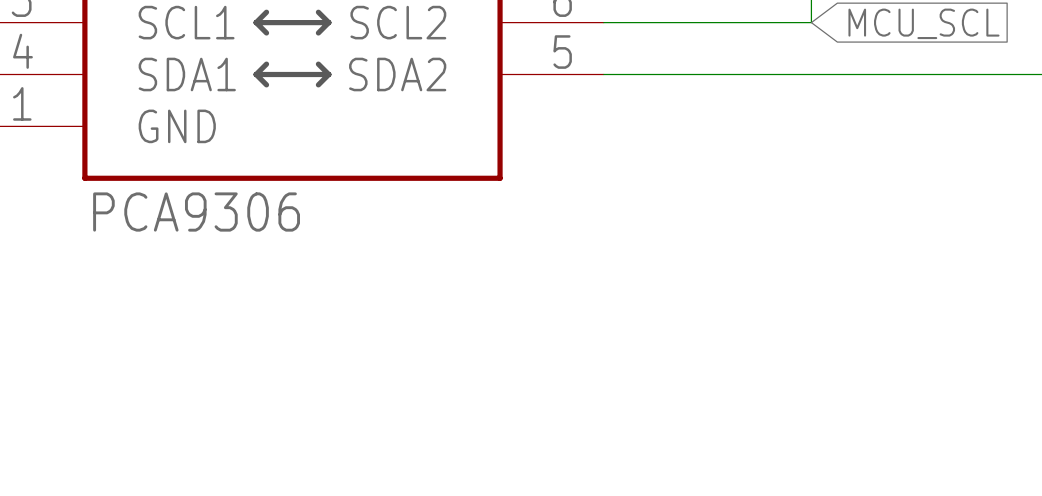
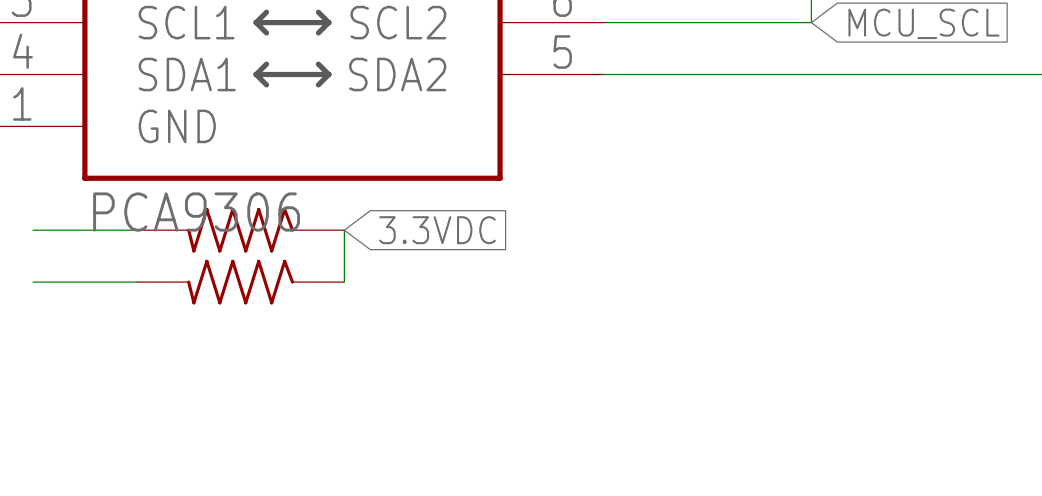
wire: none -> (33, 230) (136, 230)
part: none -> (240, 230)
wire: none -> (344, 230) (344, 282)
global label: none -> 3.3VDC (437, 230)
wire: none -> (33, 282) (136, 282)
part: none -> (240, 282)

